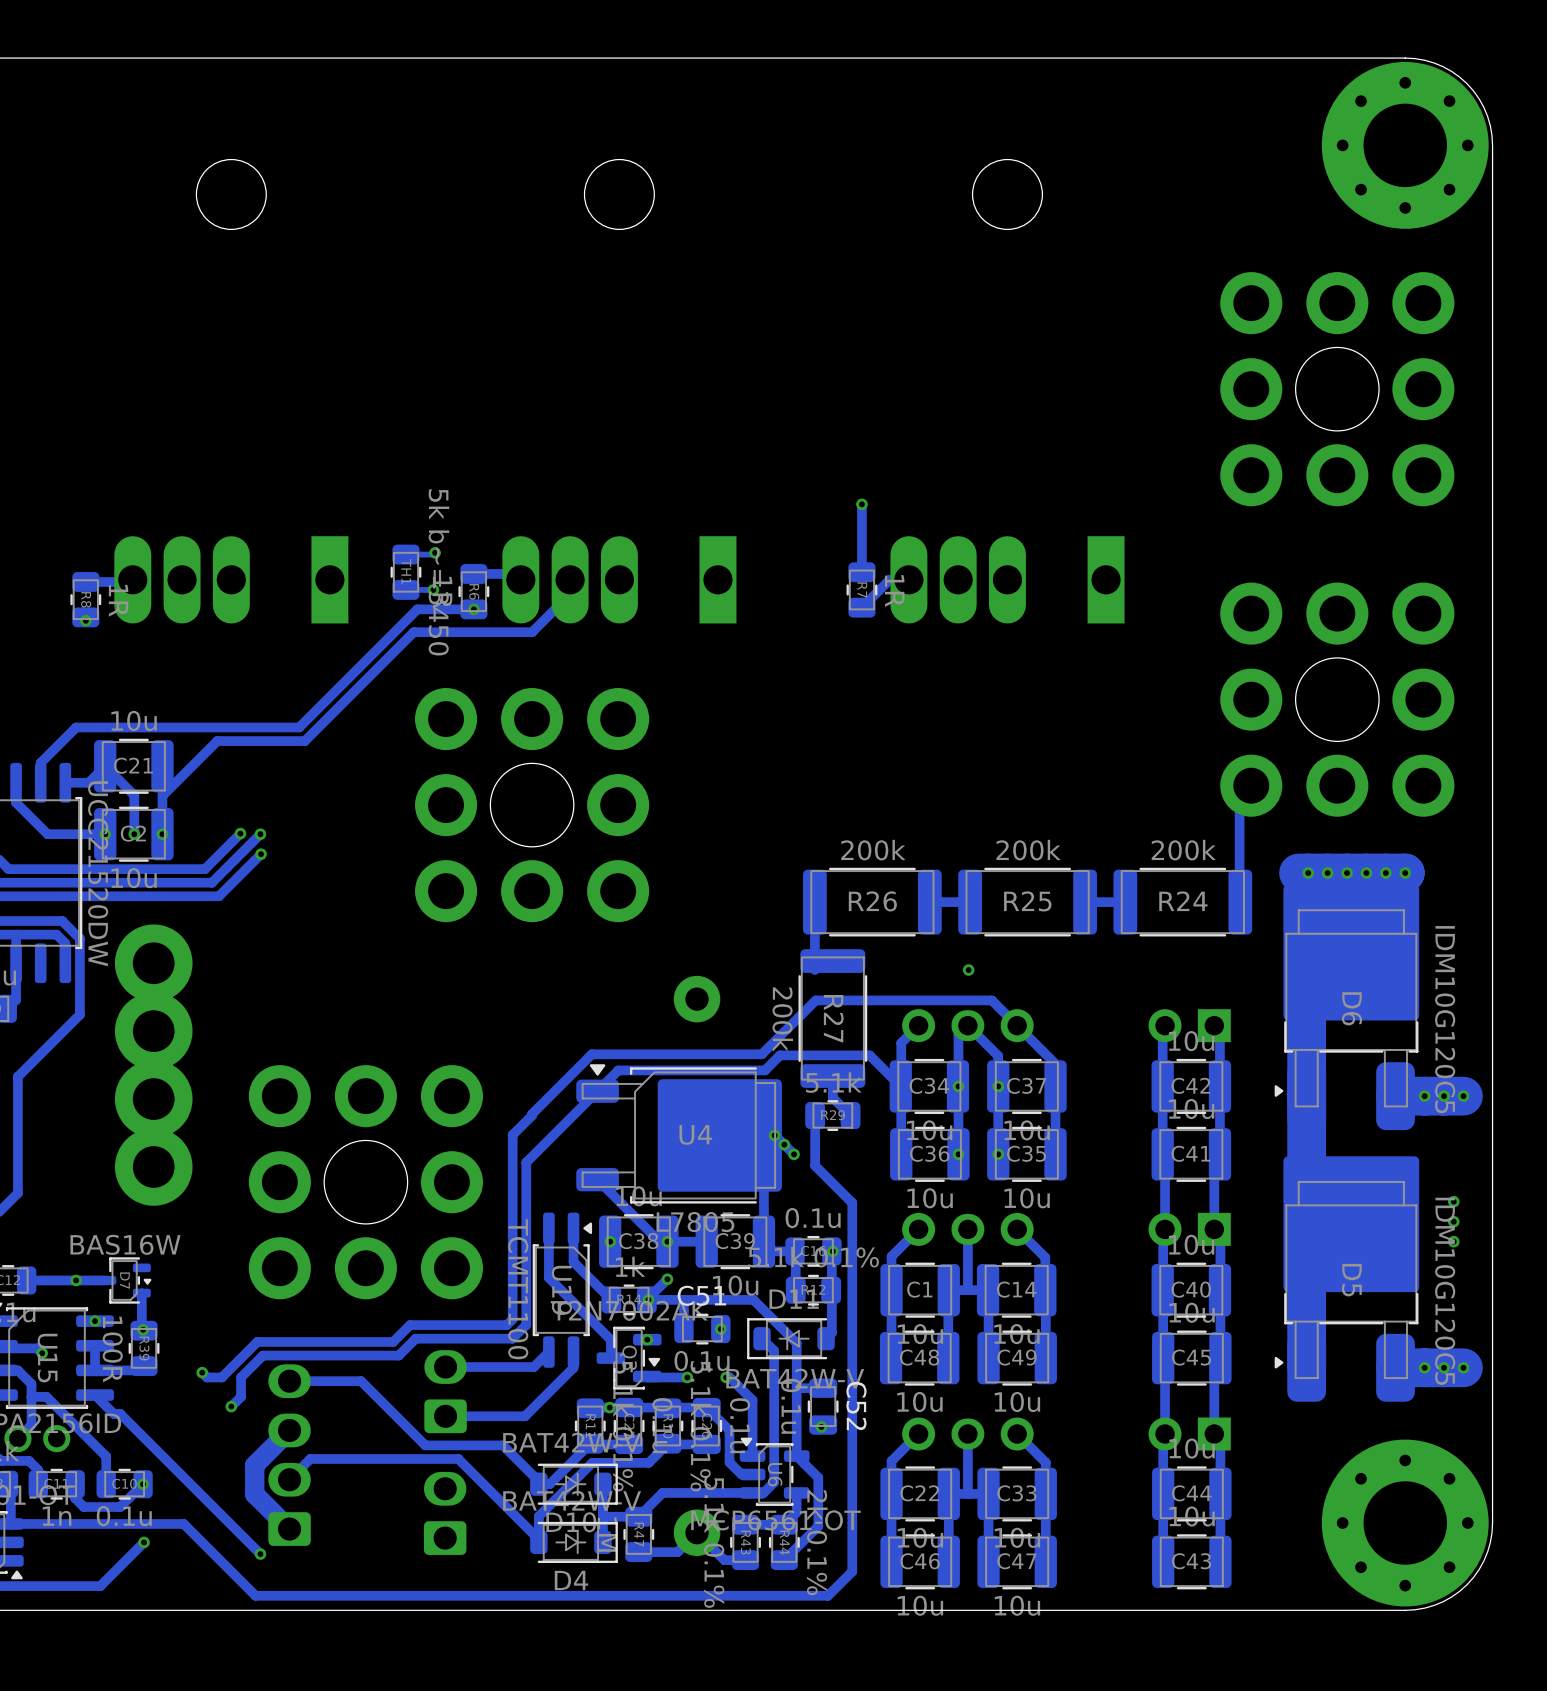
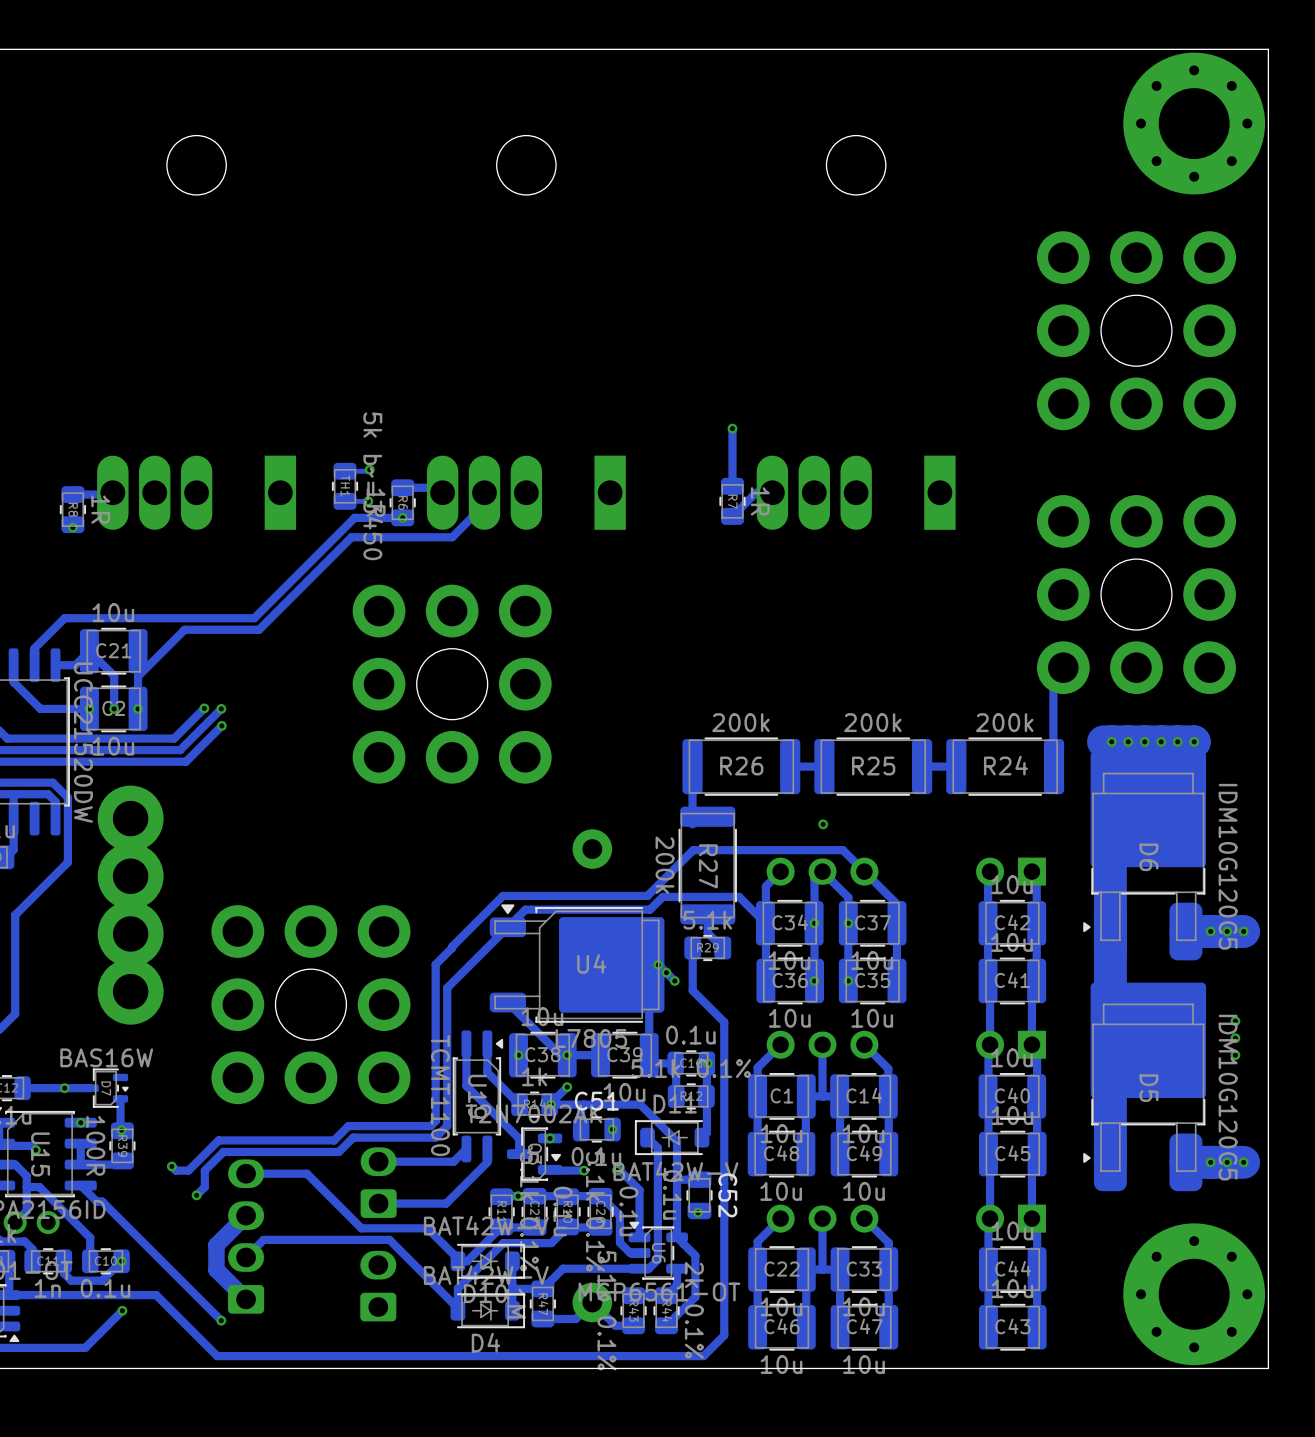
board edge: (1405, 58) (1434, 62) (1451, 71) (1466, 83) (1479, 98) (1487, 116) (1492, 145) -> (1194, 49) (1268, 49) (1268, 123)
board edge: (1492, 1523) (1490, 1542) (1483, 1560) (1466, 1584) (1443, 1601) (1424, 1608) (1405, 1610) -> (1268, 1294) (1268, 1368) (1194, 1368)

